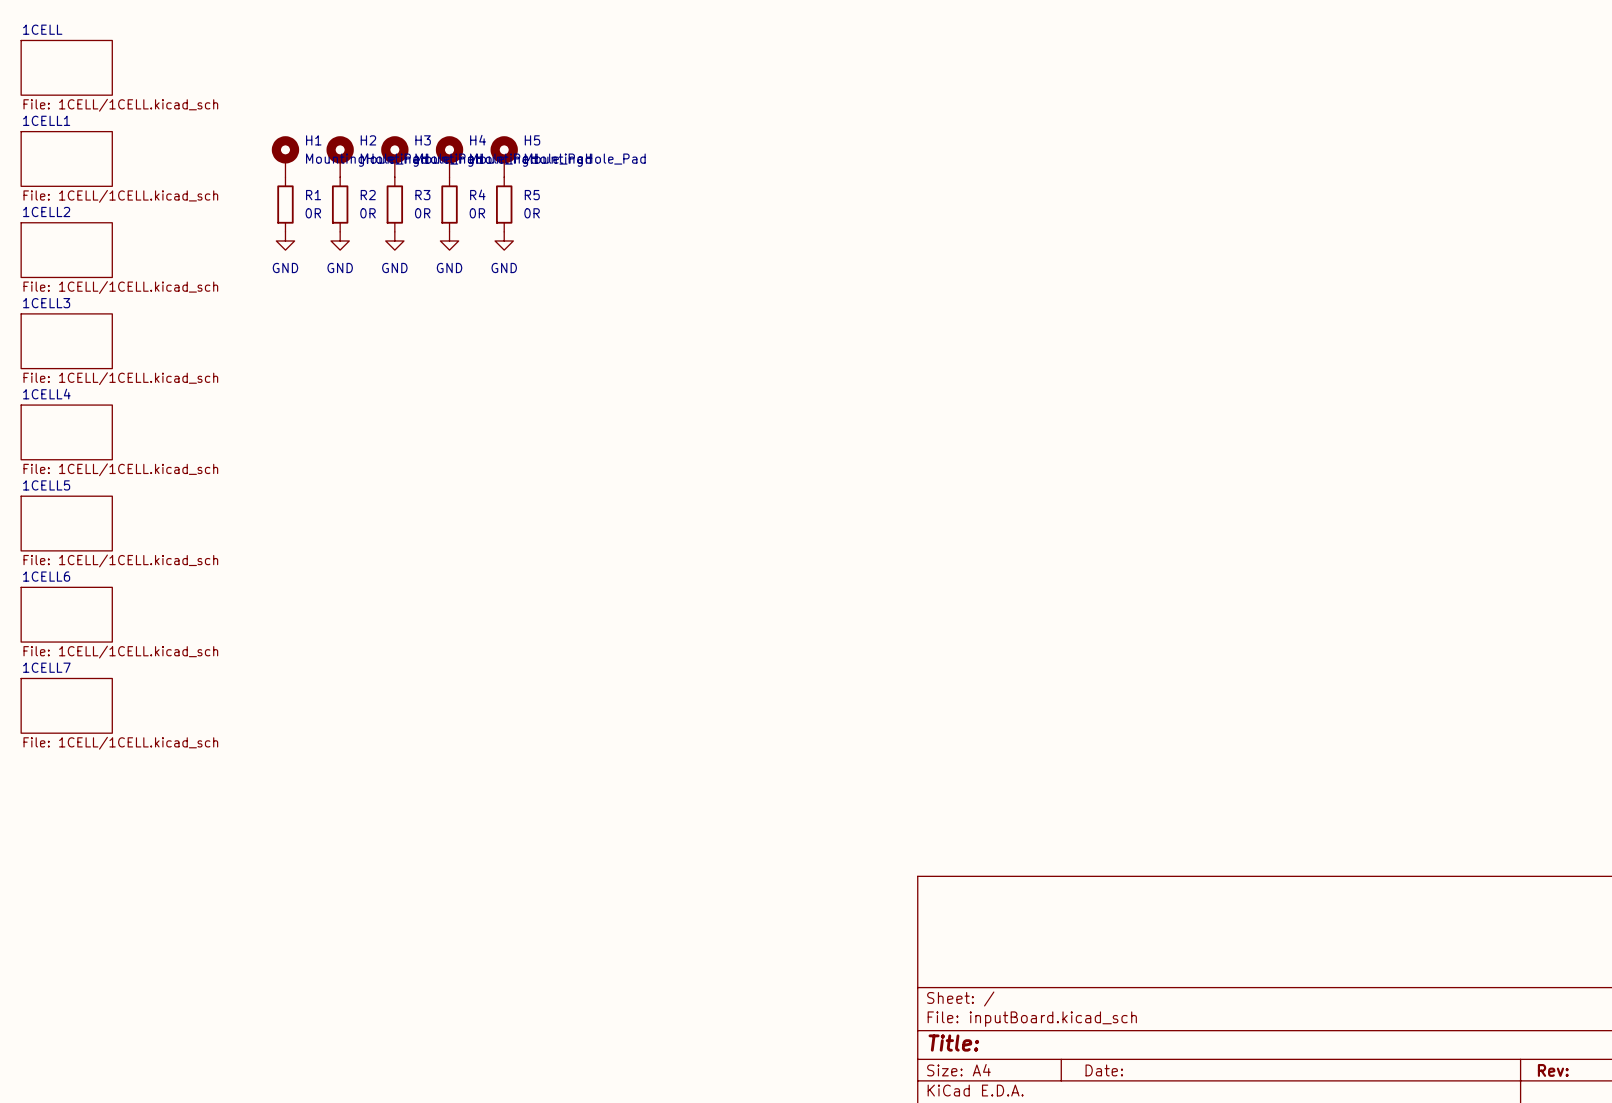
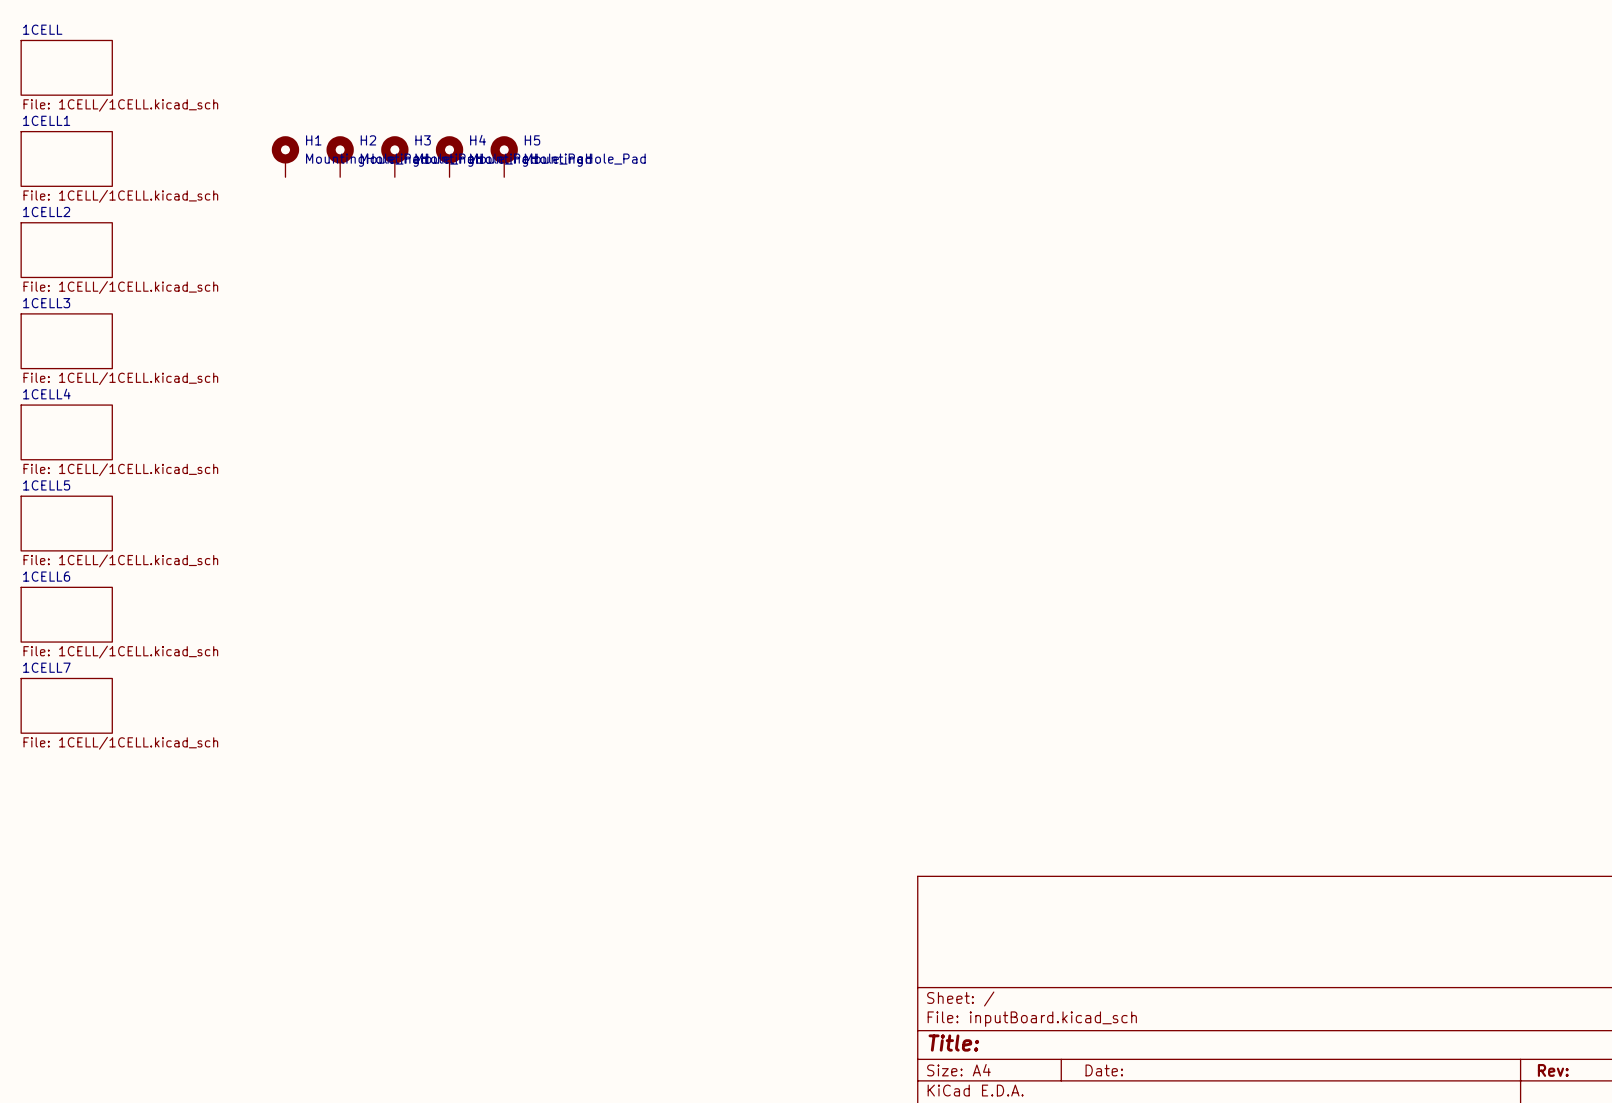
R1: 0R (285, 204) -> none
R2: 0R (340, 204) -> none
R3: 0R (394, 204) -> none
R4: 0R (449, 204) -> none
R5: 0R (504, 204) -> none
power symbol: GND (285, 240) -> none
power symbol: GND (340, 240) -> none
power symbol: GND (394, 240) -> none
power symbol: GND (449, 240) -> none
power symbol: GND (504, 240) -> none

